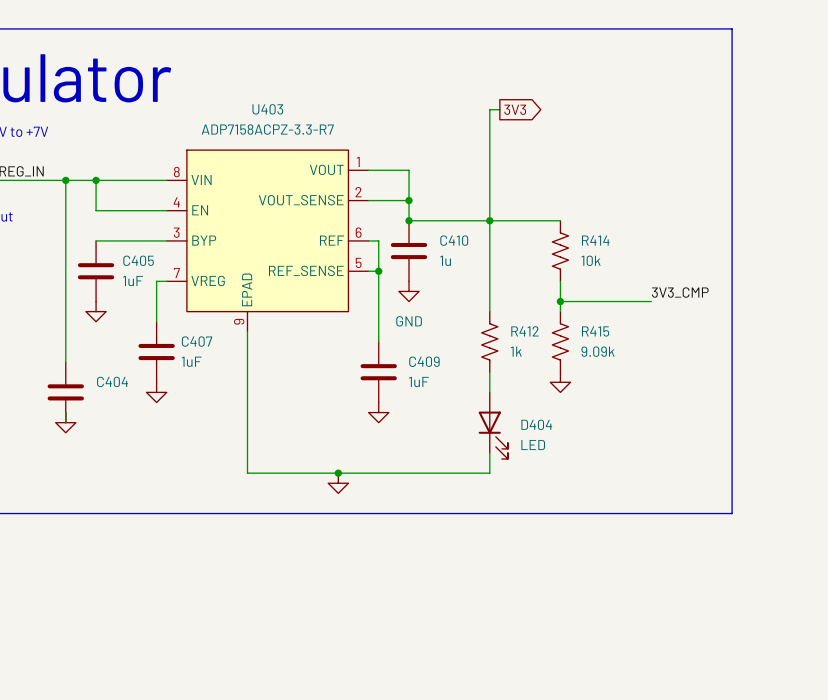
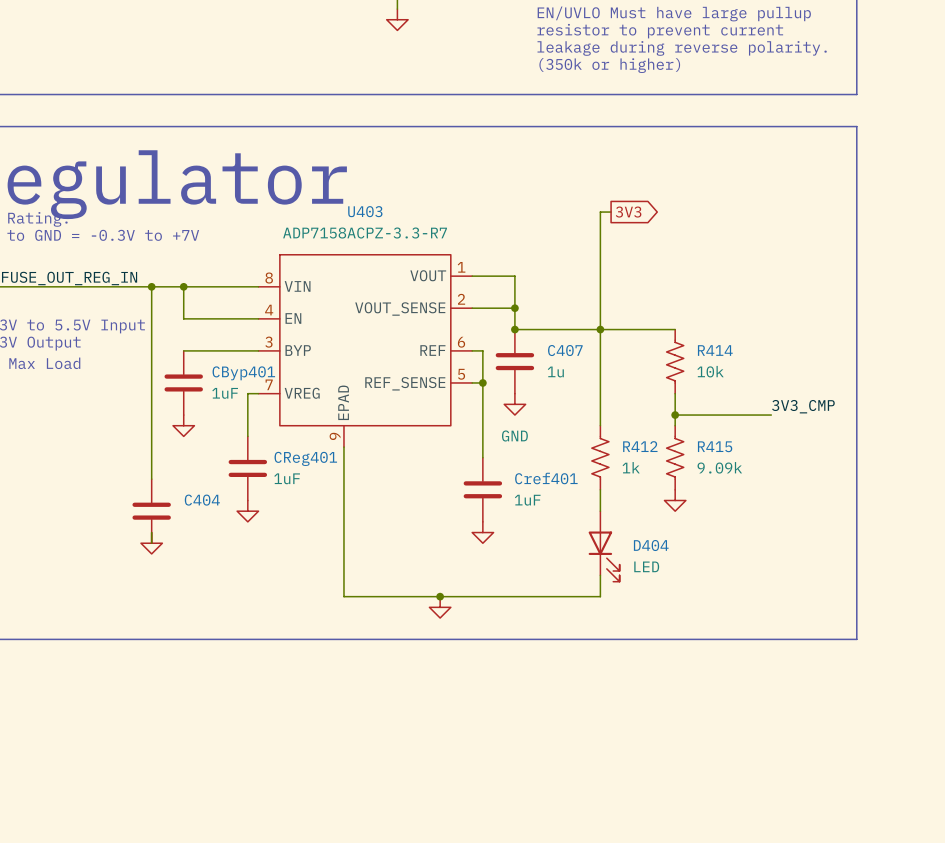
U403 symbol: [166, 150, 369, 332] -> [258, 254, 473, 448]
C410 name: C410 (454, 240) -> C407 (565, 350)
C405 name: C405 (138, 260) -> CByp401 (243, 373)
C407 name: C407 (197, 341) -> CReg401 (305, 458)
C409 name: C409 (424, 361) -> Cref401 (546, 478)

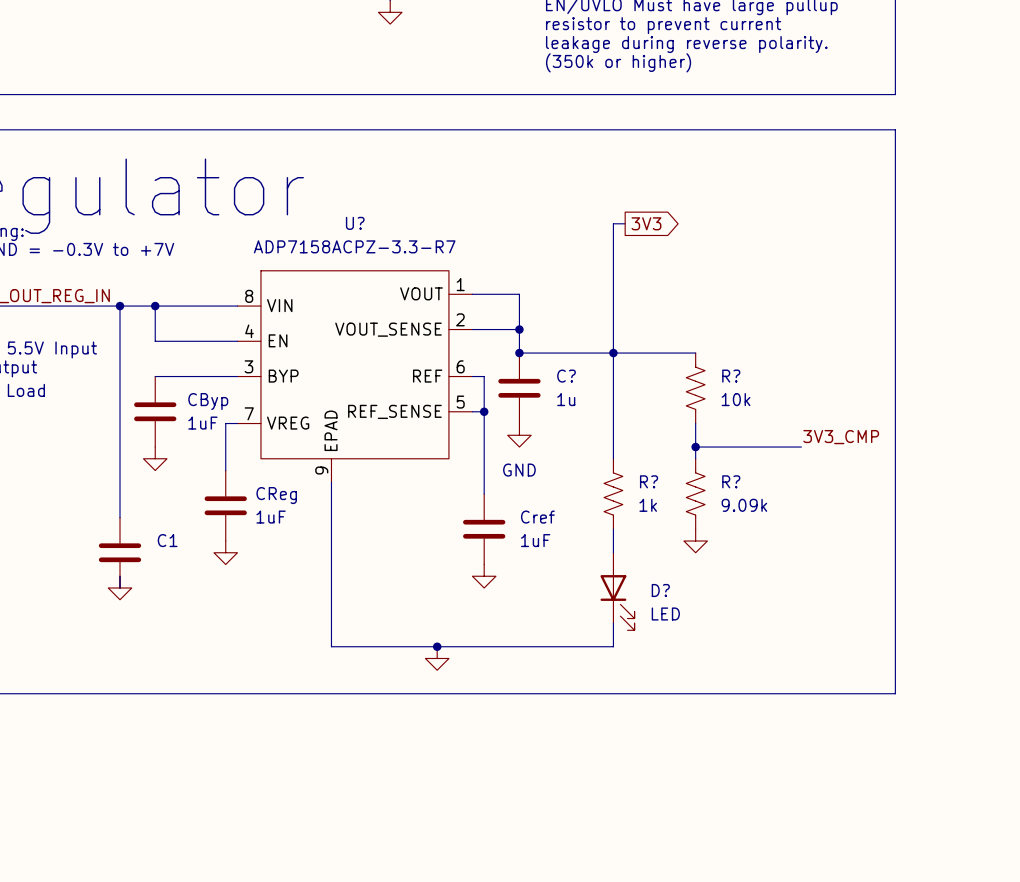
U403 name: U403 (365, 211) -> U? (355, 223)
C407 name: C407 (565, 350) -> C? (566, 376)
R414 name: R414 (715, 350) -> R? (731, 376)
CByp401 name: CByp401 (243, 373) -> CByp (208, 401)
R412 name: R412 (640, 446) -> R? (649, 481)
R415 name: R415 (715, 446) -> R? (731, 481)
CReg401 name: CReg401 (305, 458) -> CReg (276, 495)
Cref401 name: Cref401 (546, 478) -> Cref (537, 517)
C404 name: C404 (202, 500) -> C1 (167, 540)
D404 name: D404 (651, 545) -> D? (660, 590)

